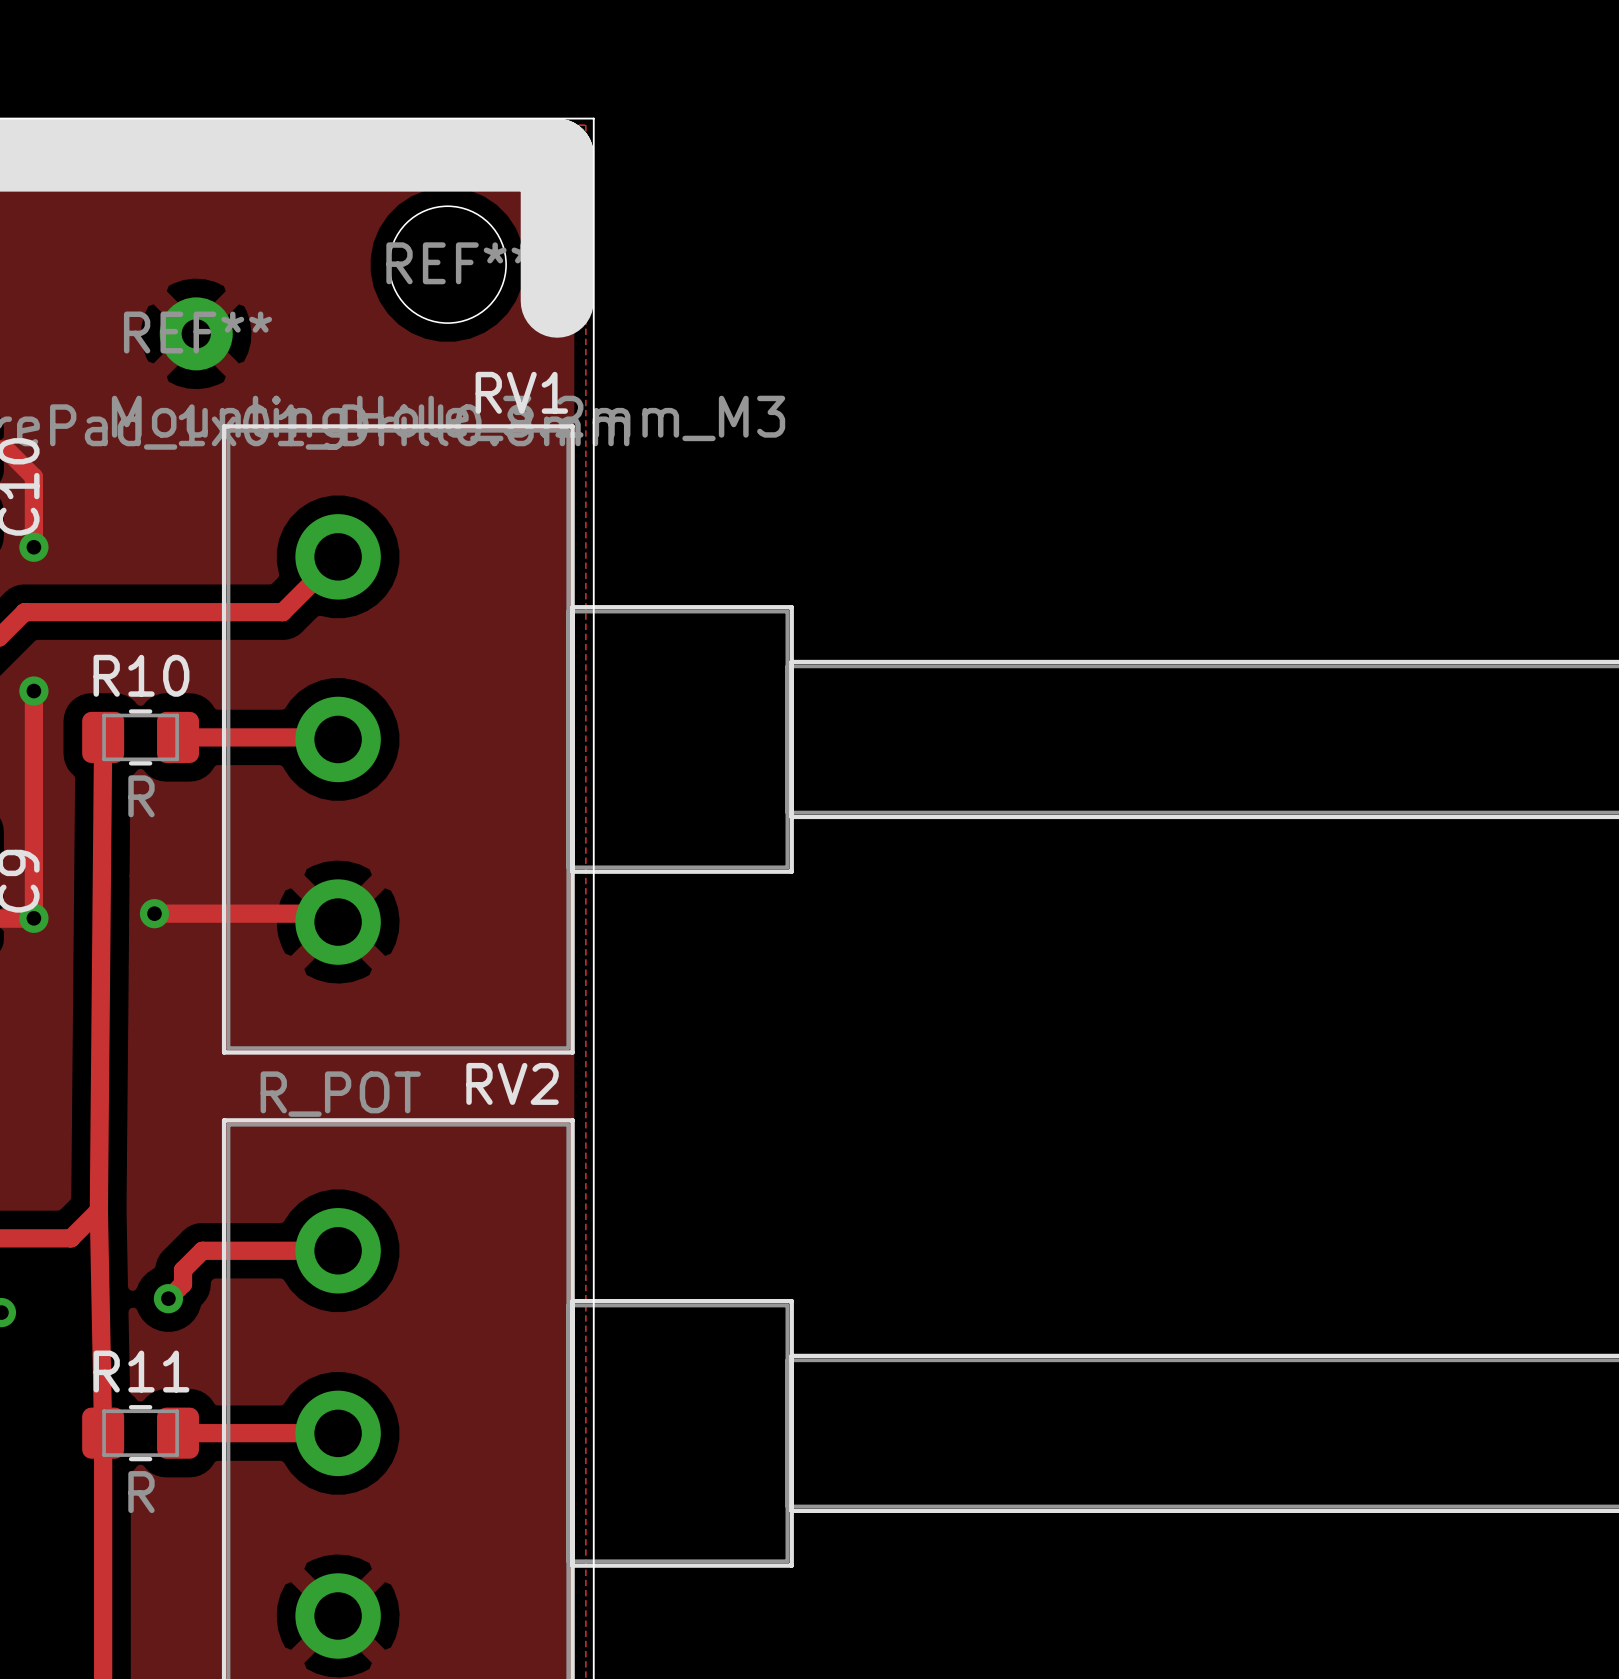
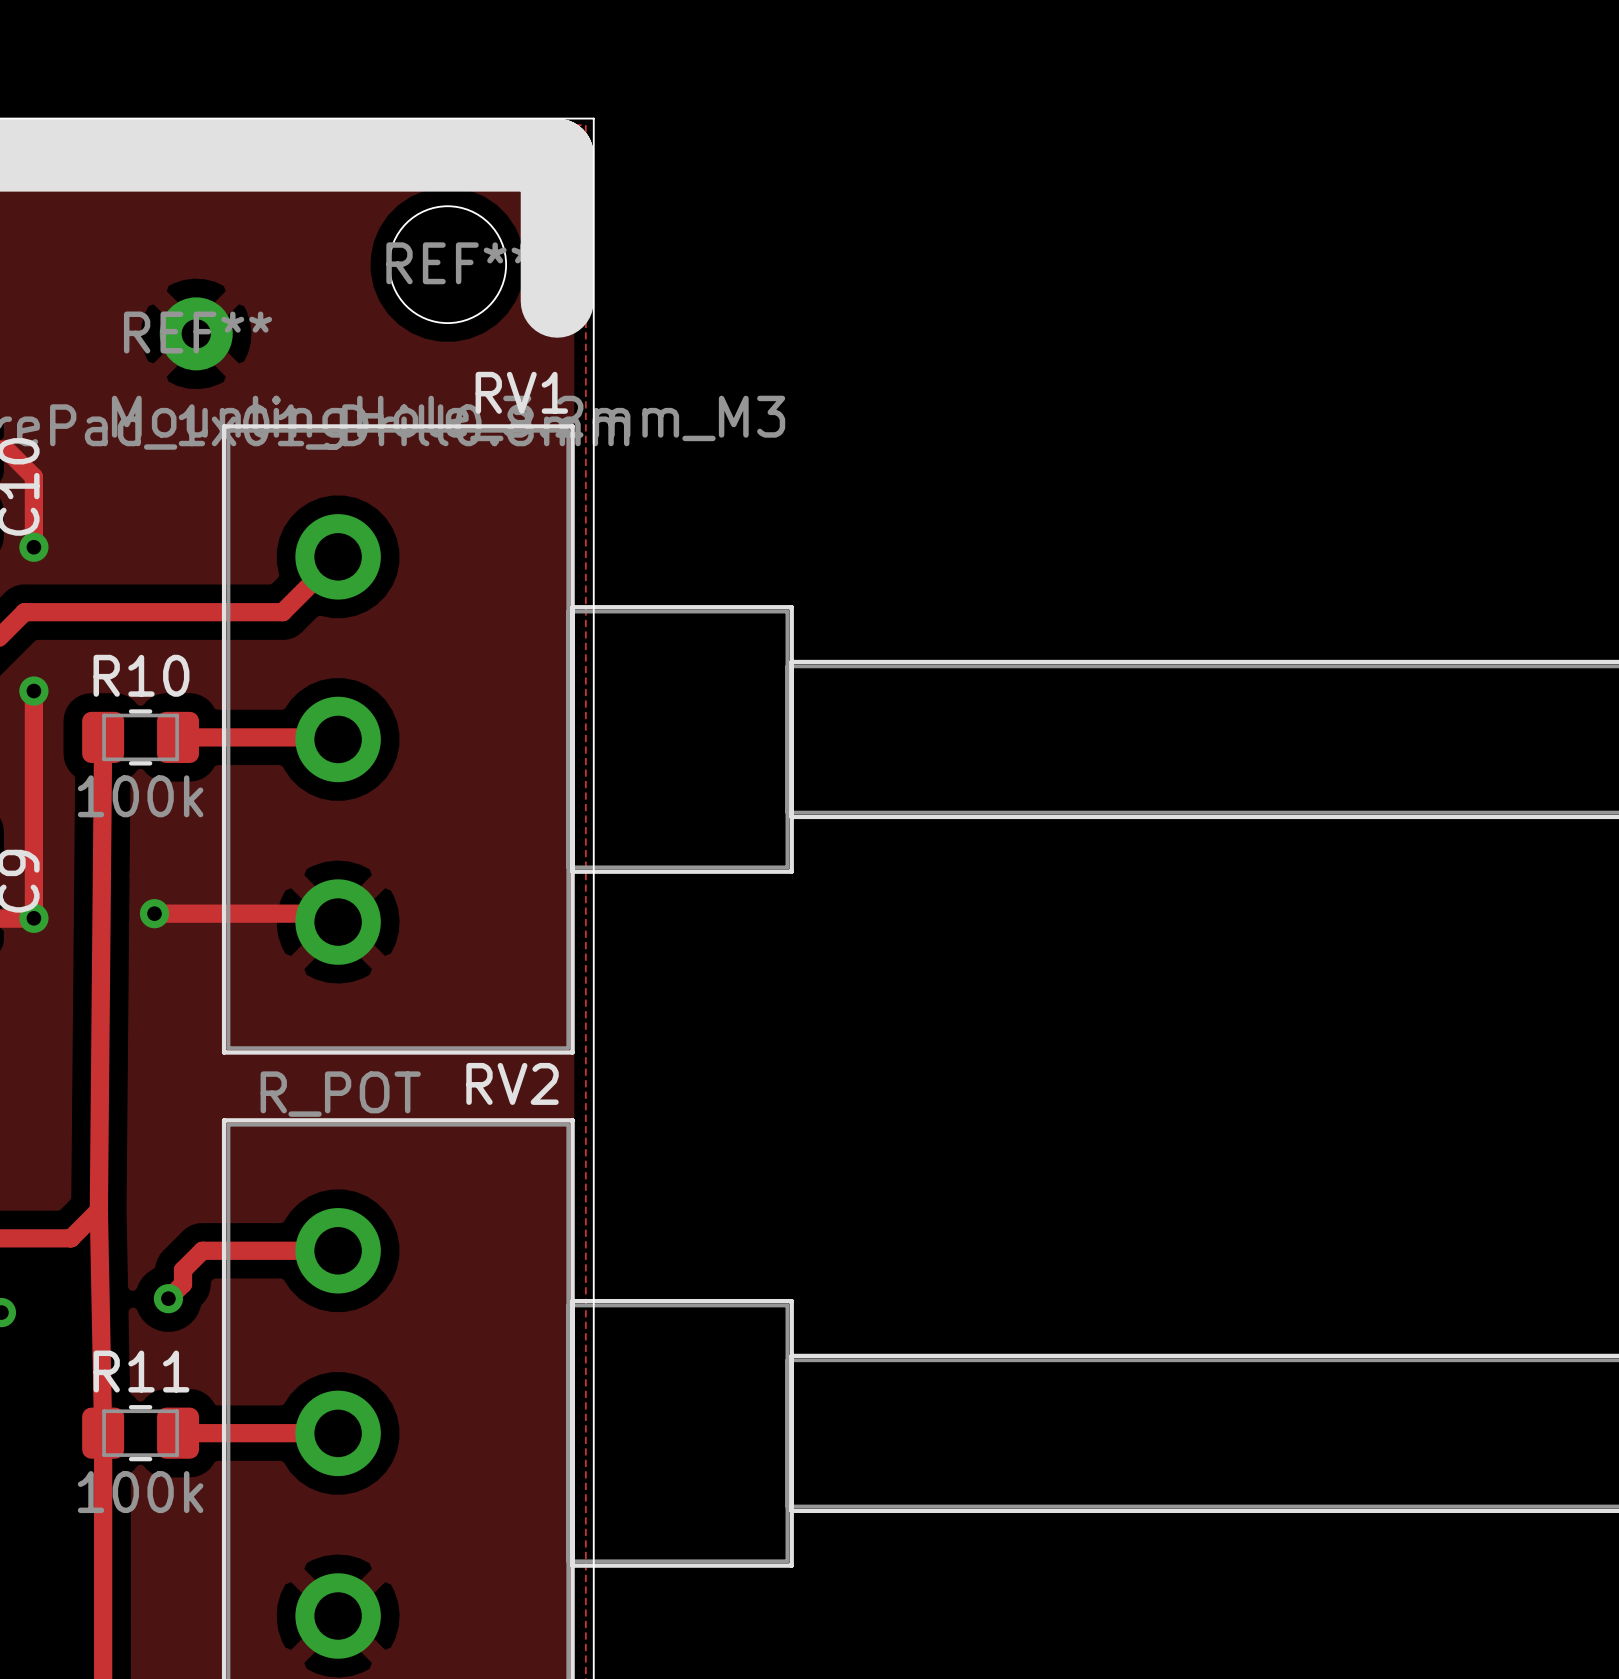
R10 value: R (141, 796) -> 100k (140, 796)
R11 value: R (141, 1492) -> 100k (140, 1492)

